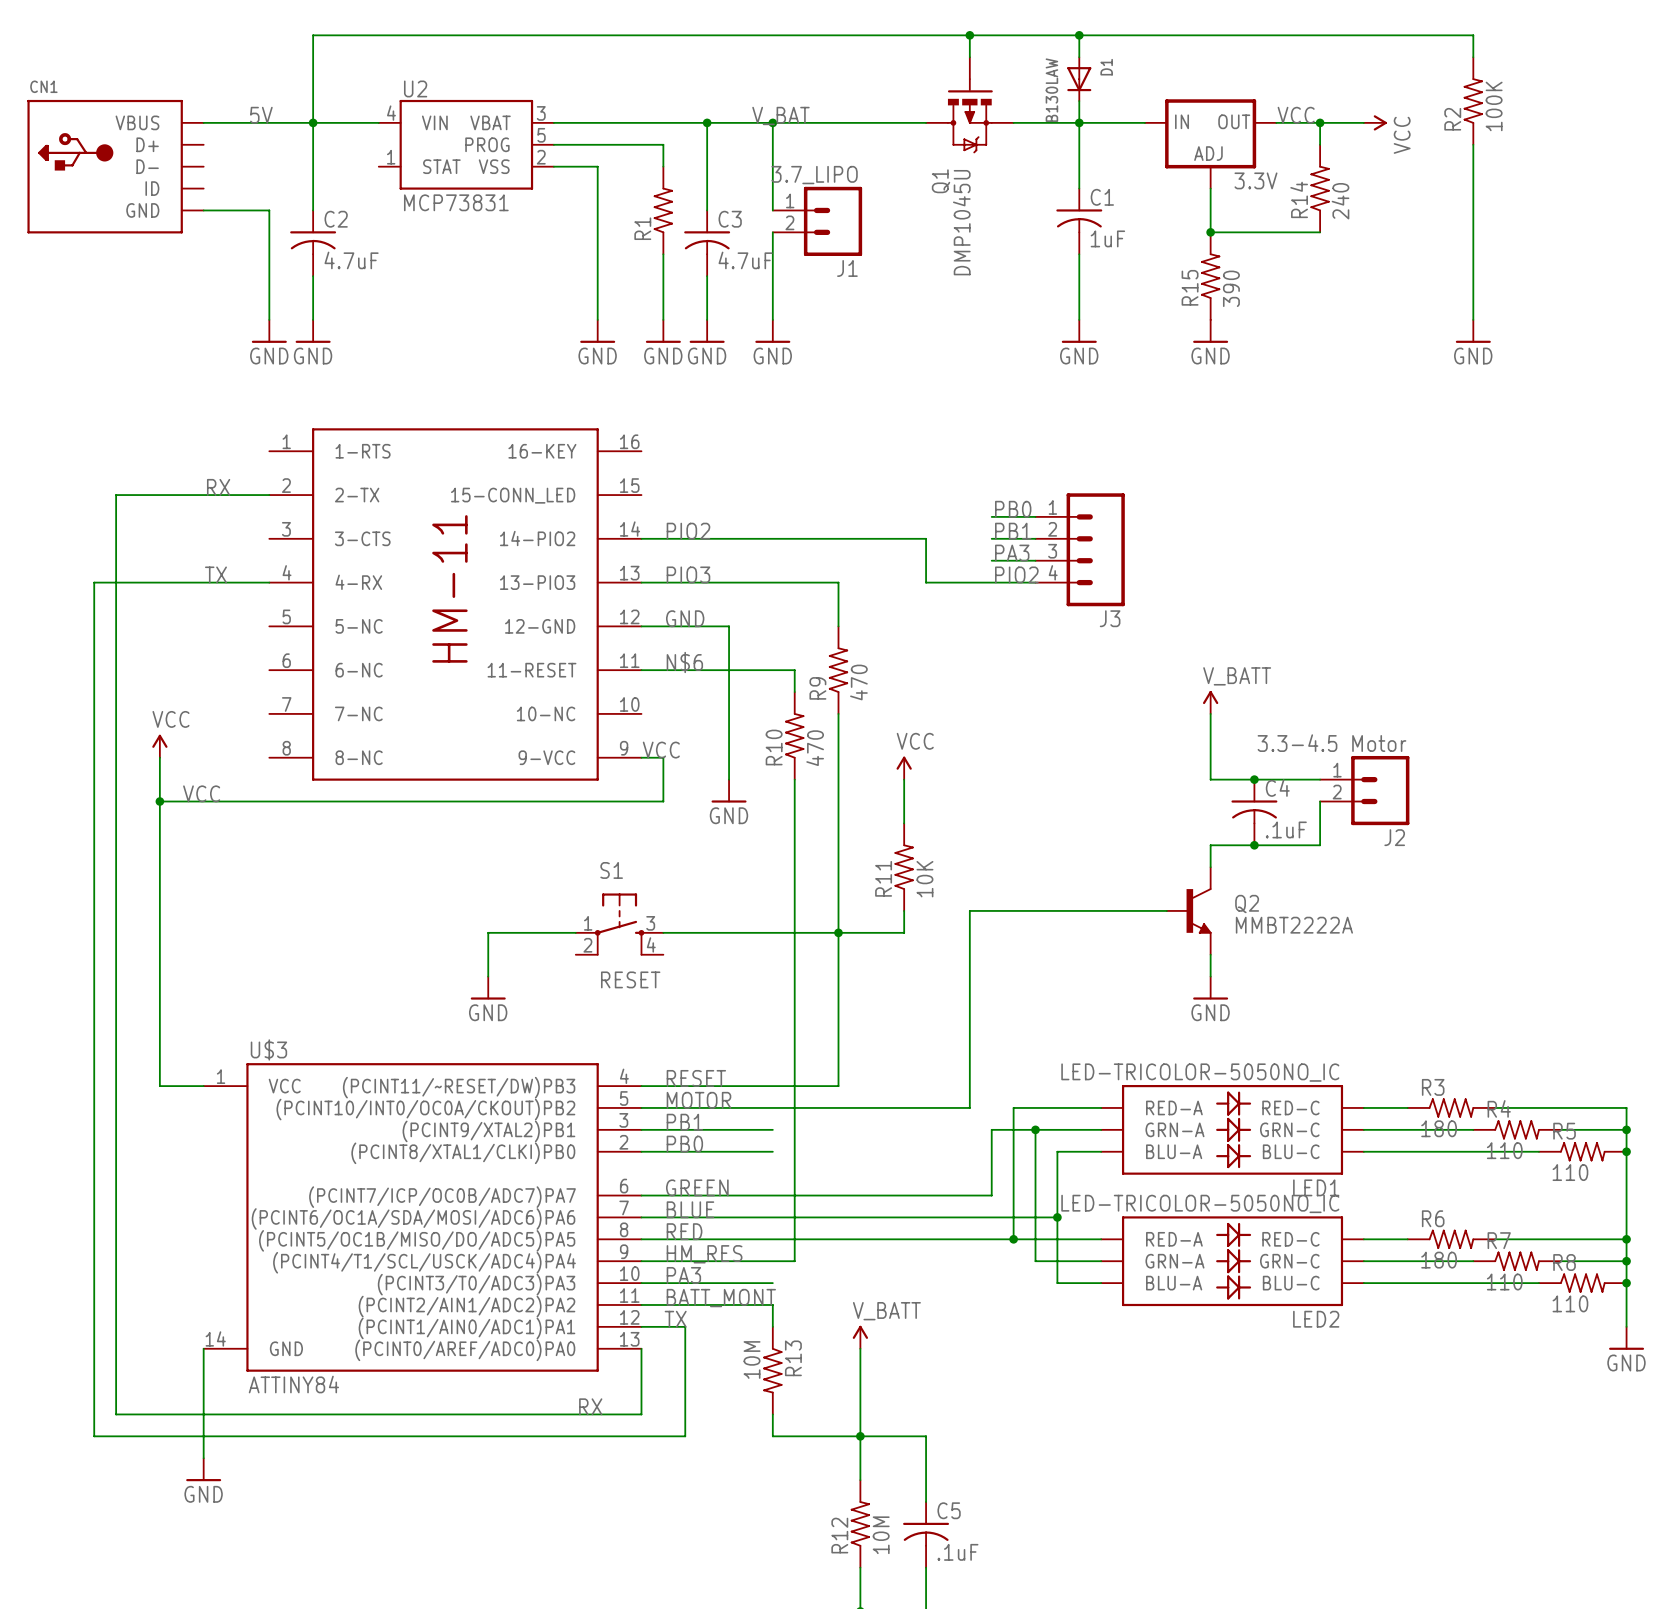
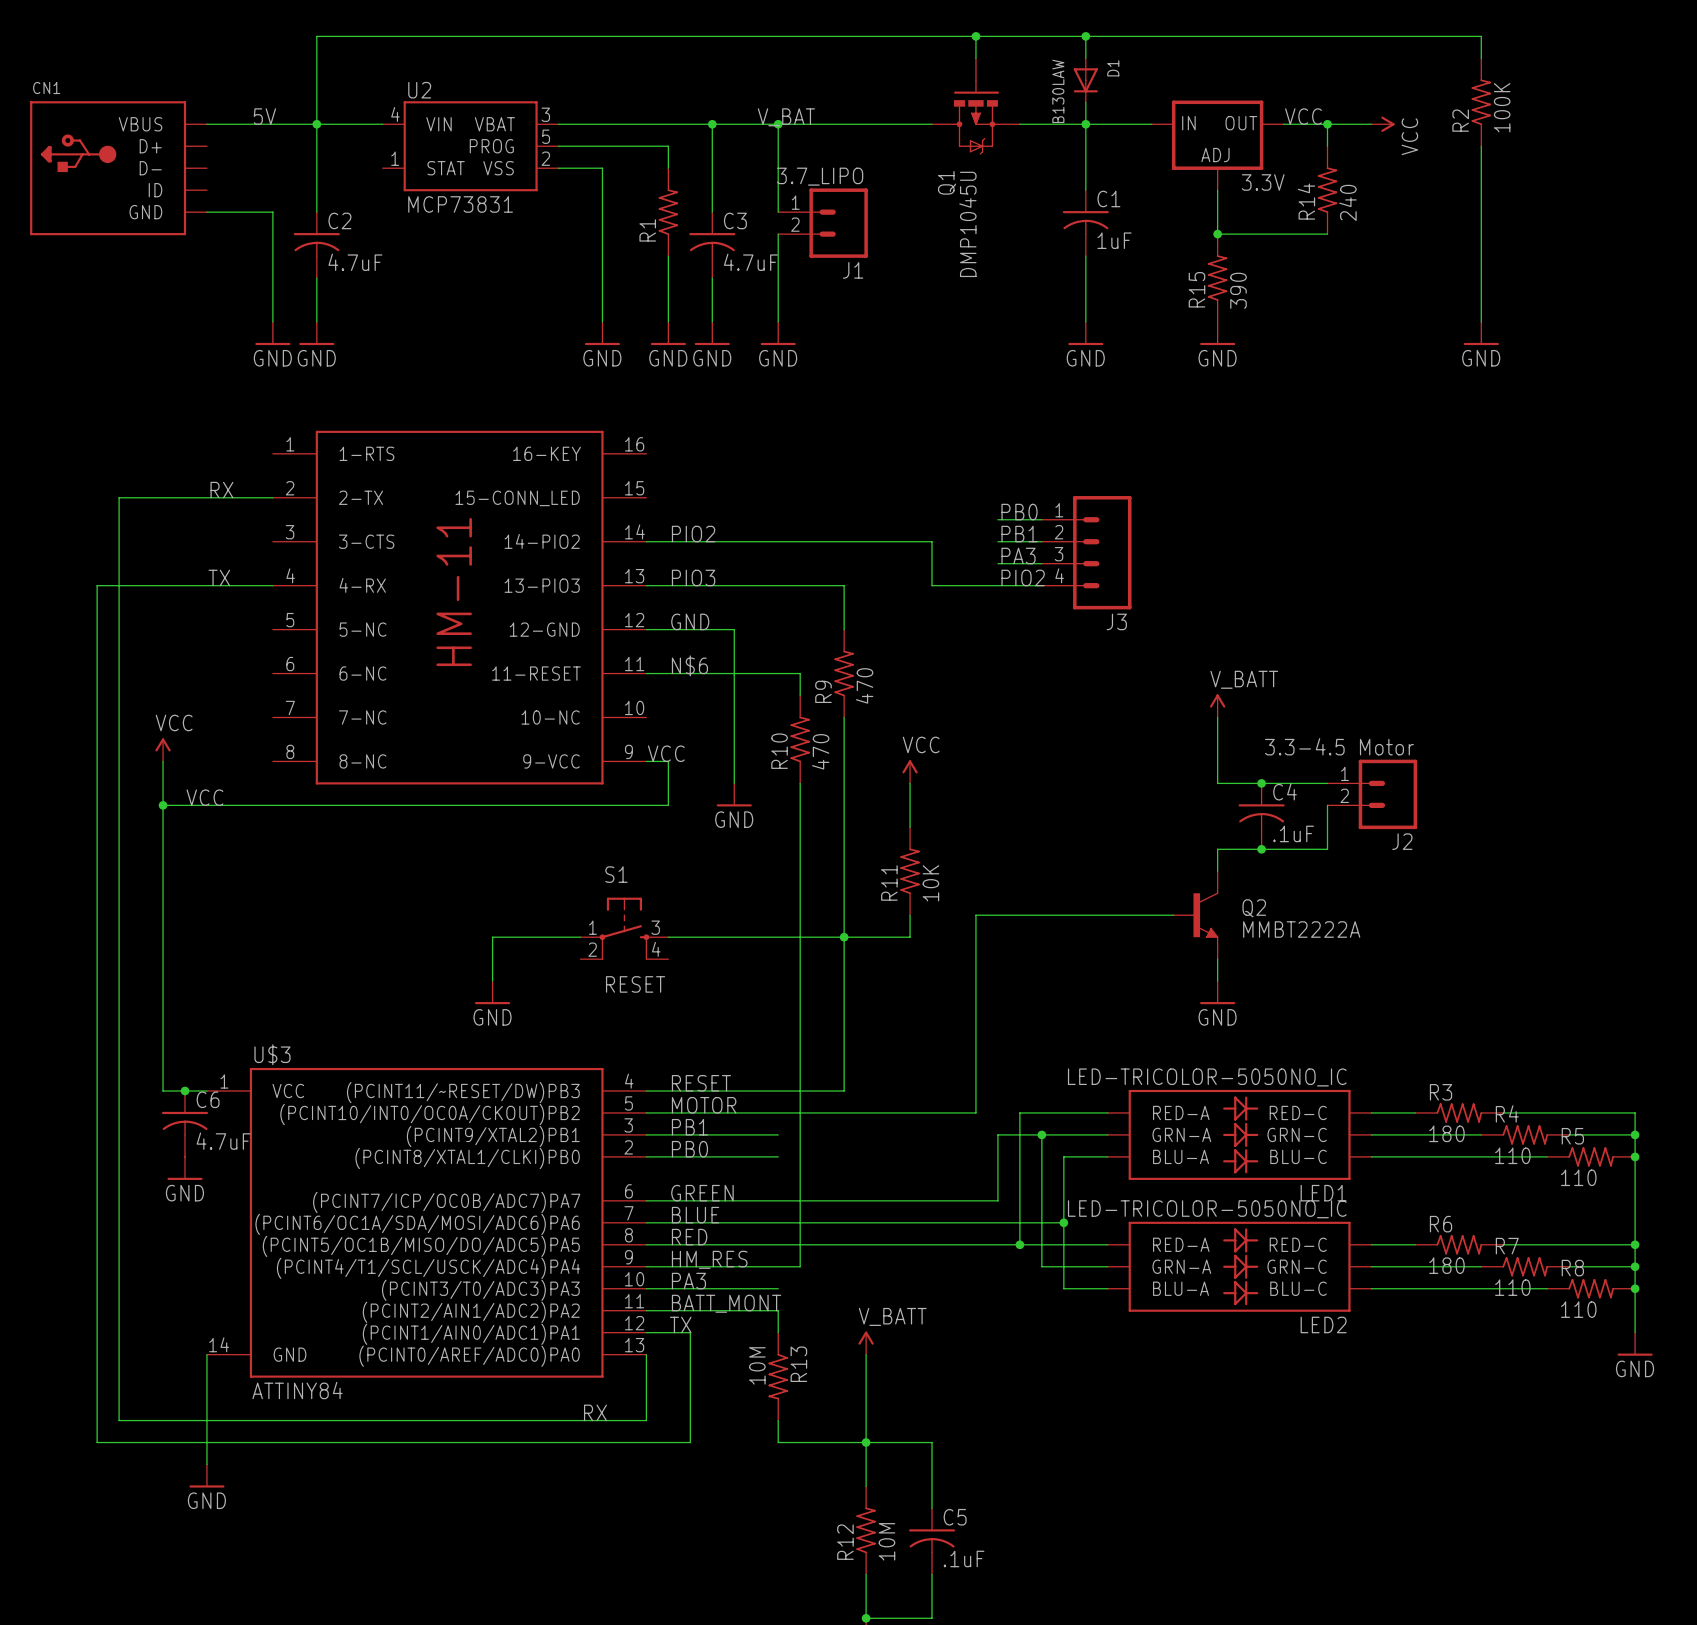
junction: none -> (185, 1090)
C6: none -> 4.7uF (185, 1123)
power symbol: none -> GND (185, 1168)

